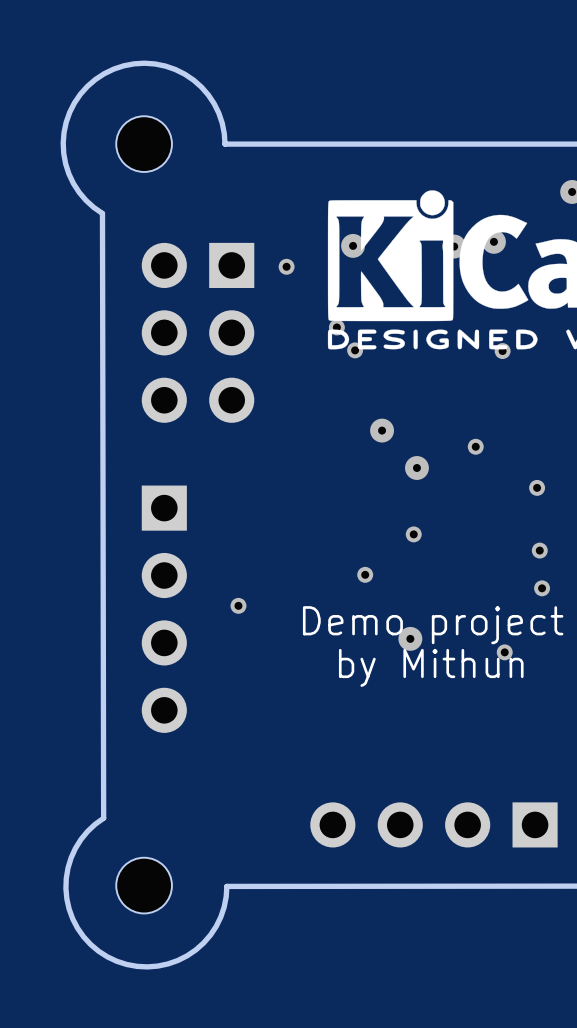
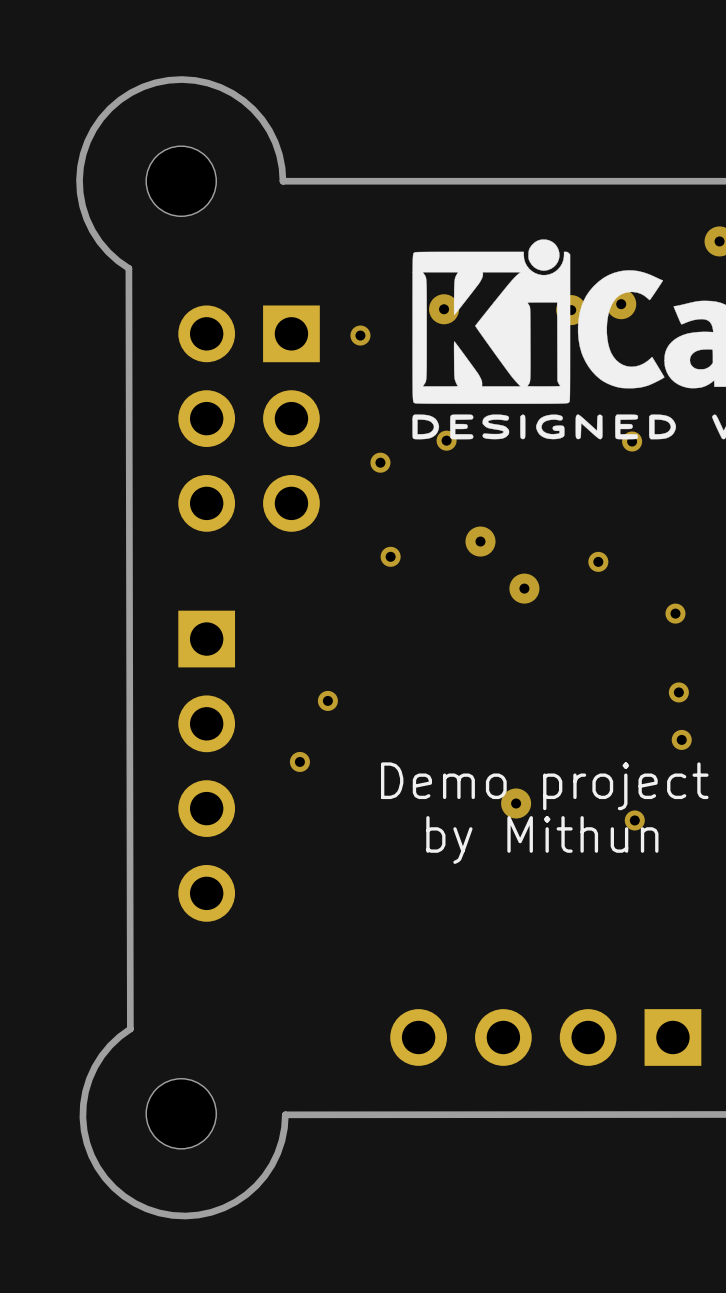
via position: (336, 327) -> (380, 462)
via: none -> (390, 556)
via: (413, 534) -> none
via: none -> (327, 700)
via: (365, 574) -> none

